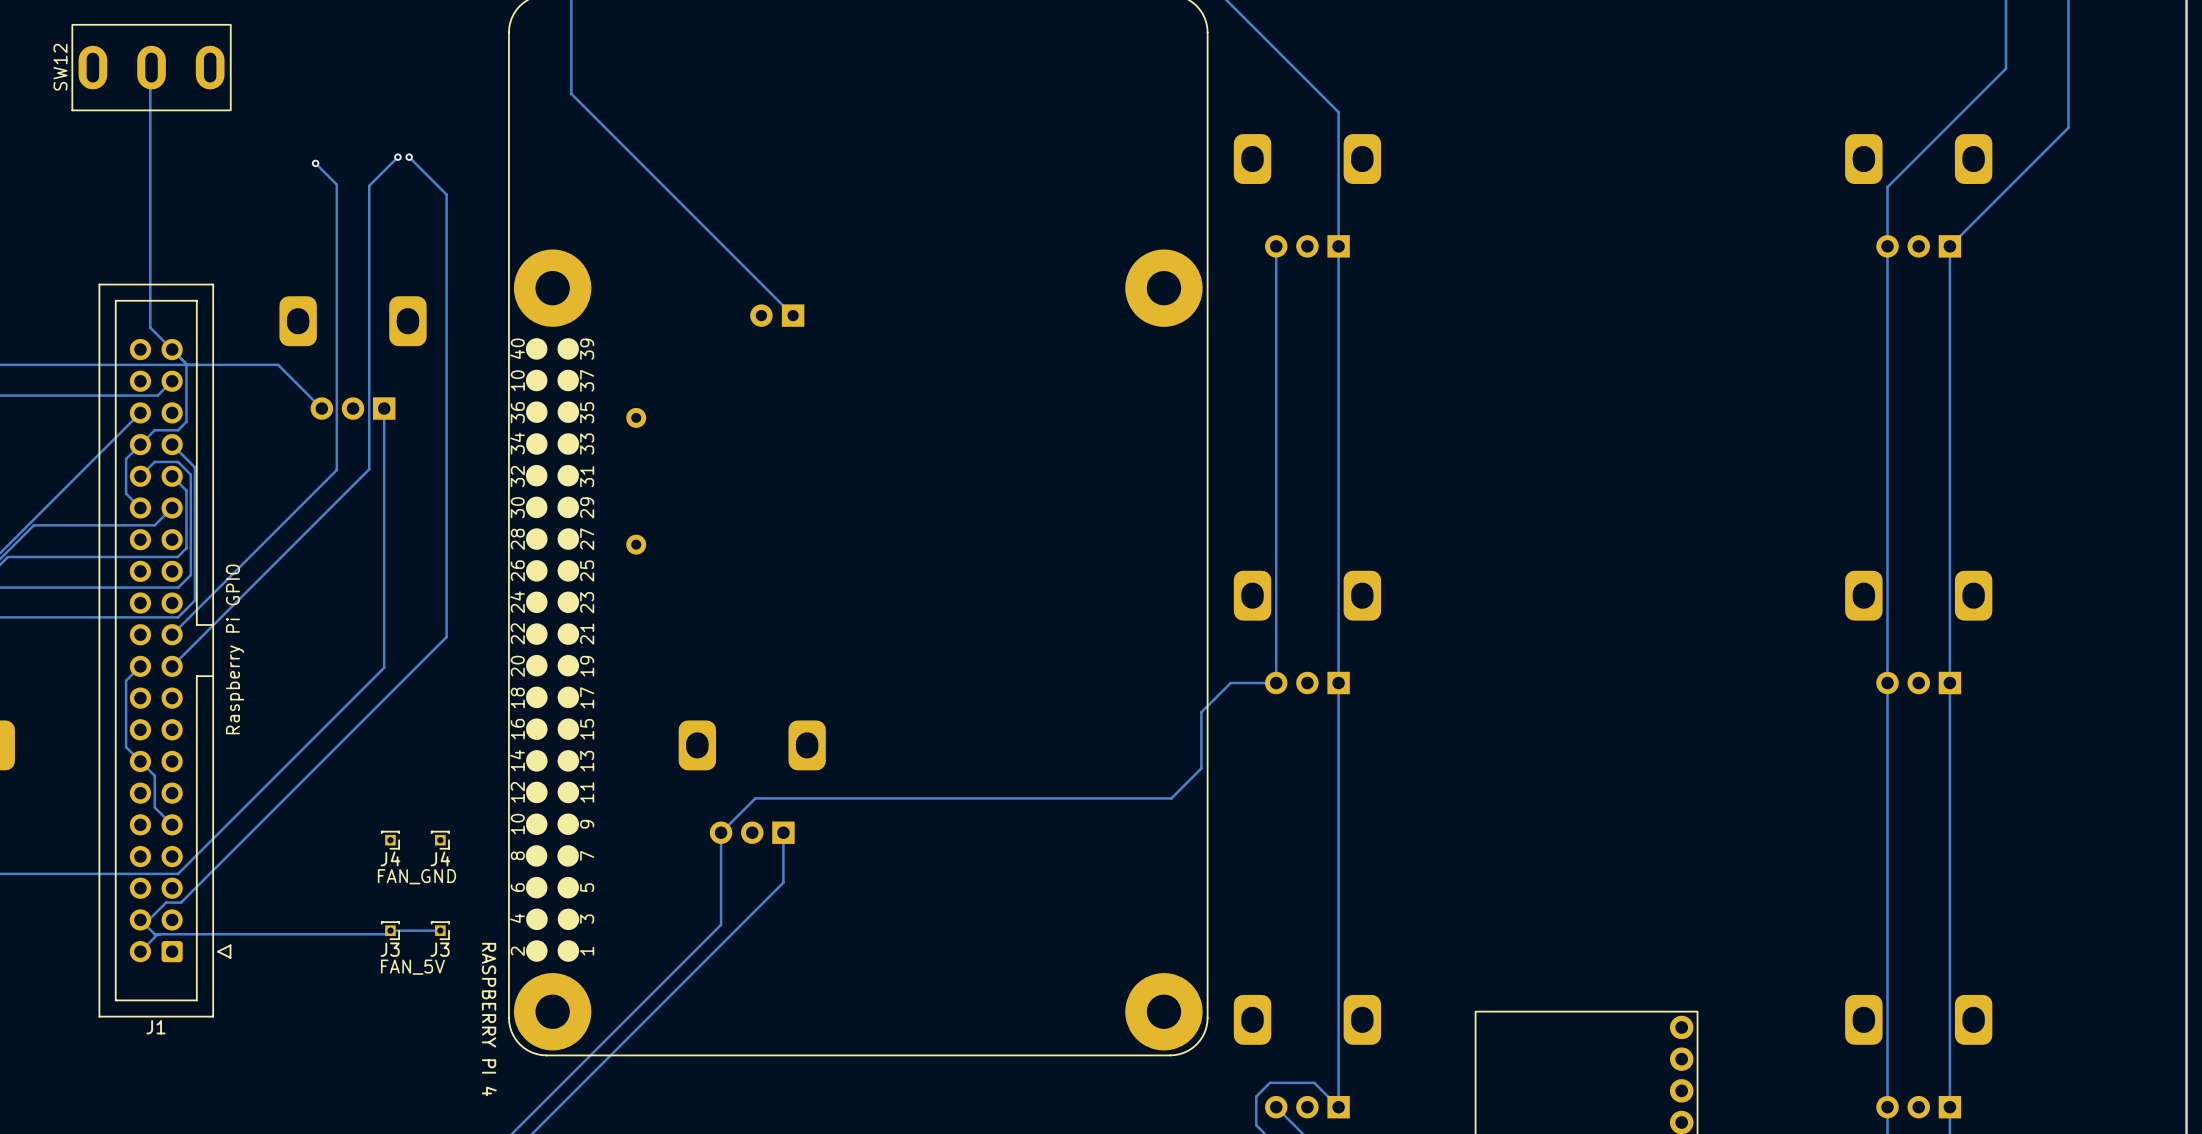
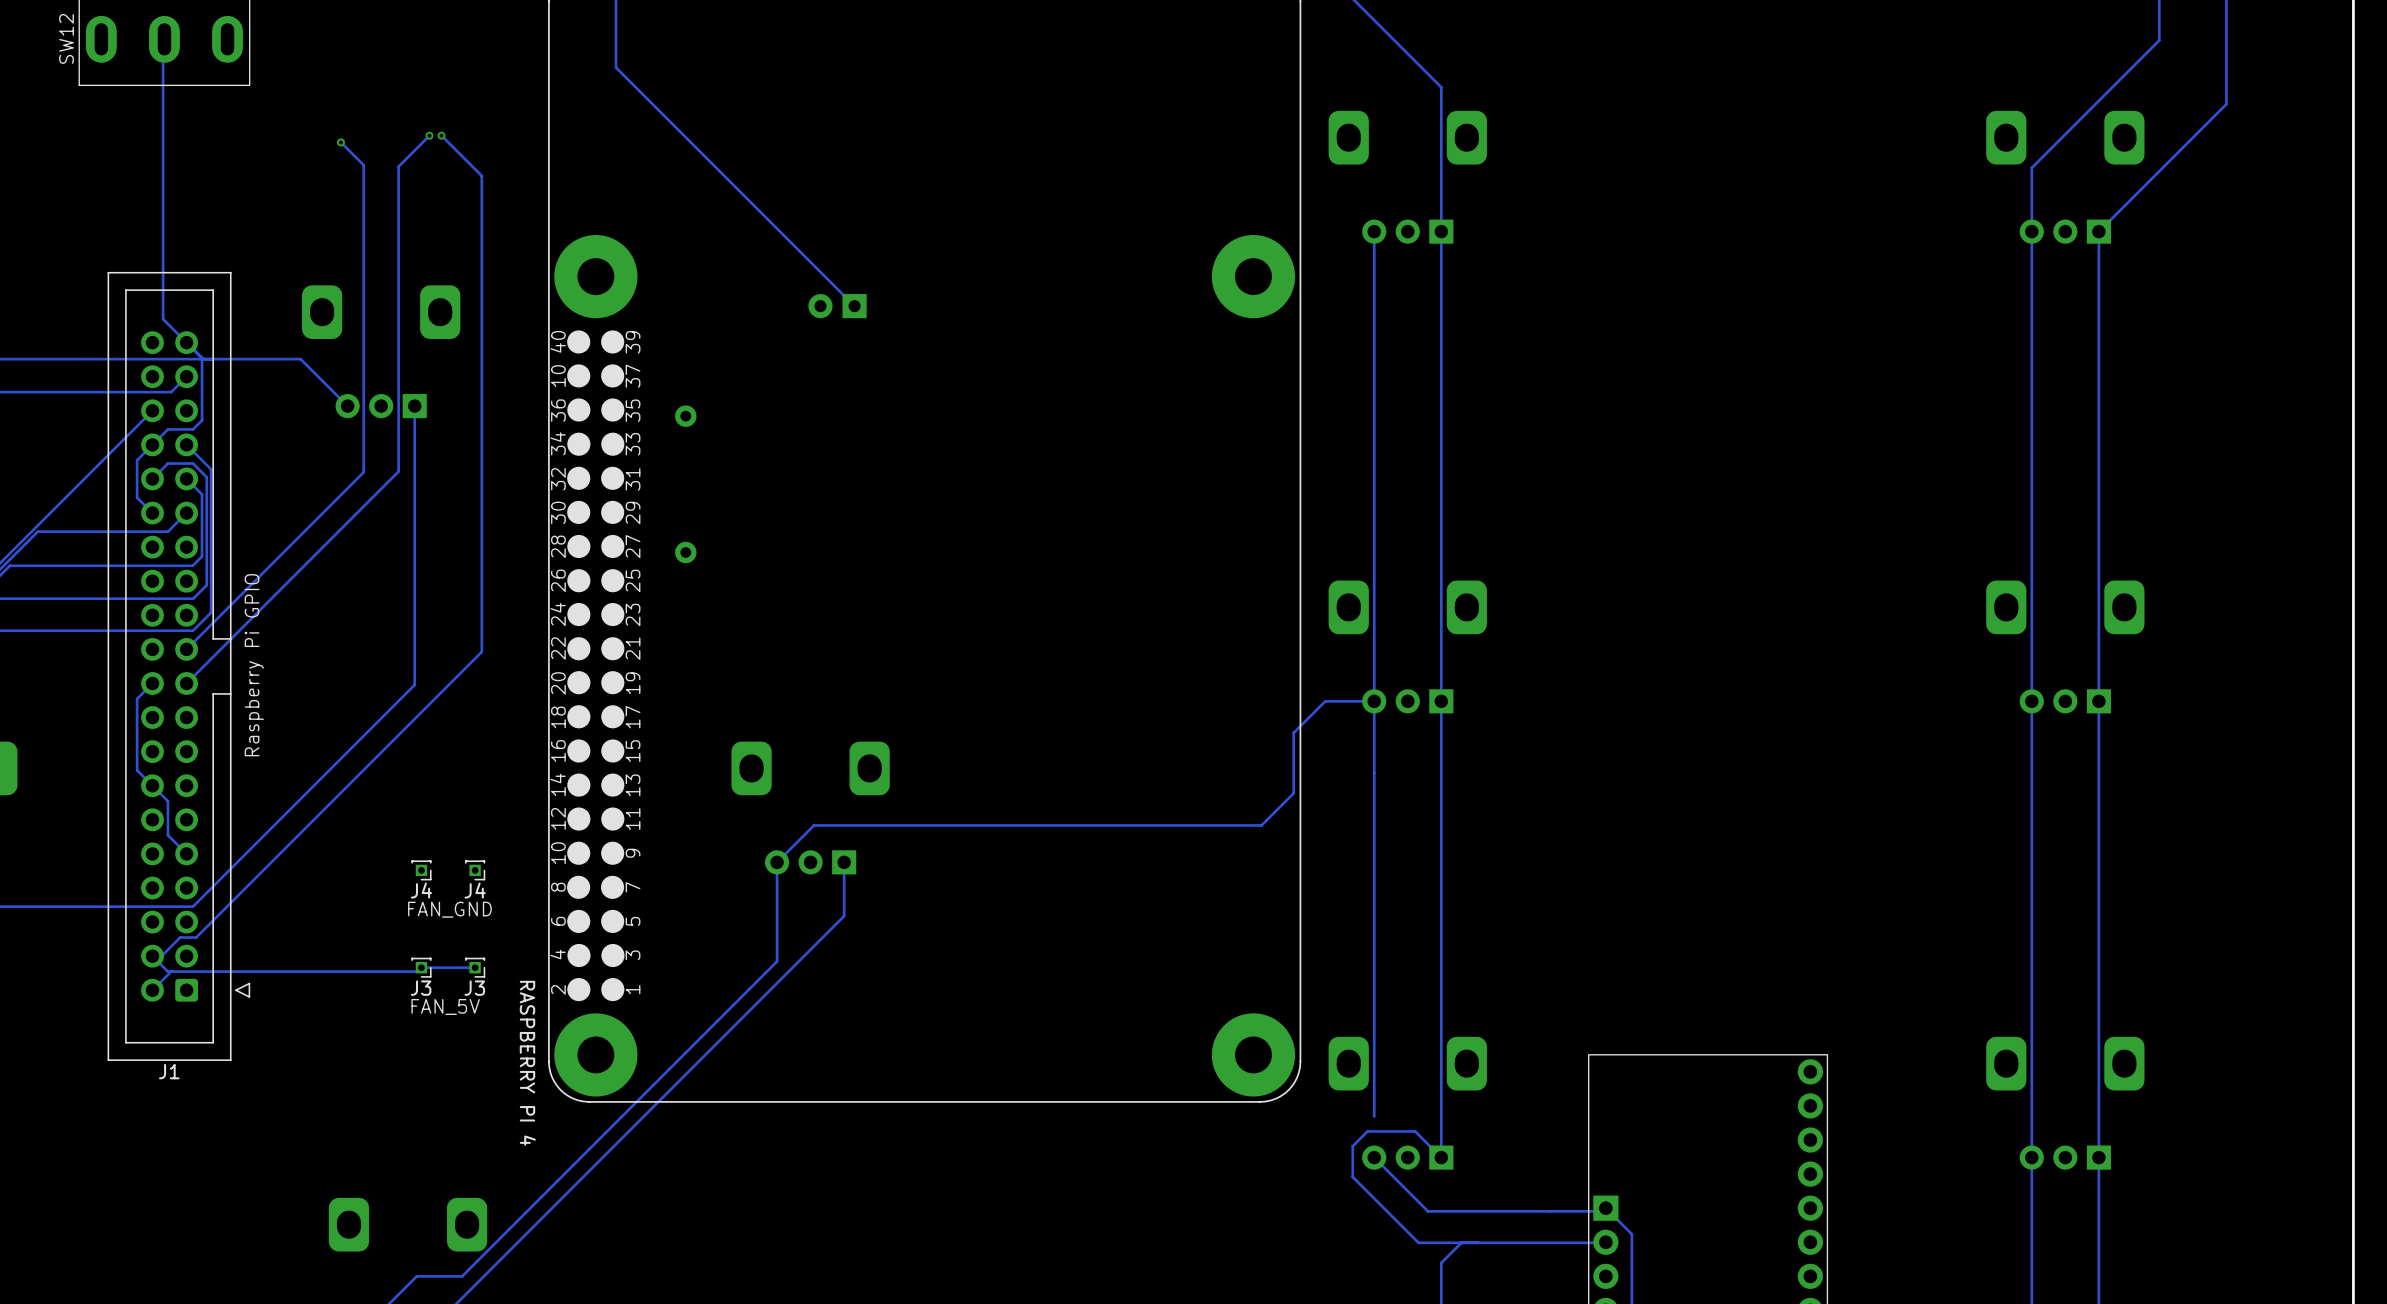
track: none -> (1374, 701) (1374, 1116)

